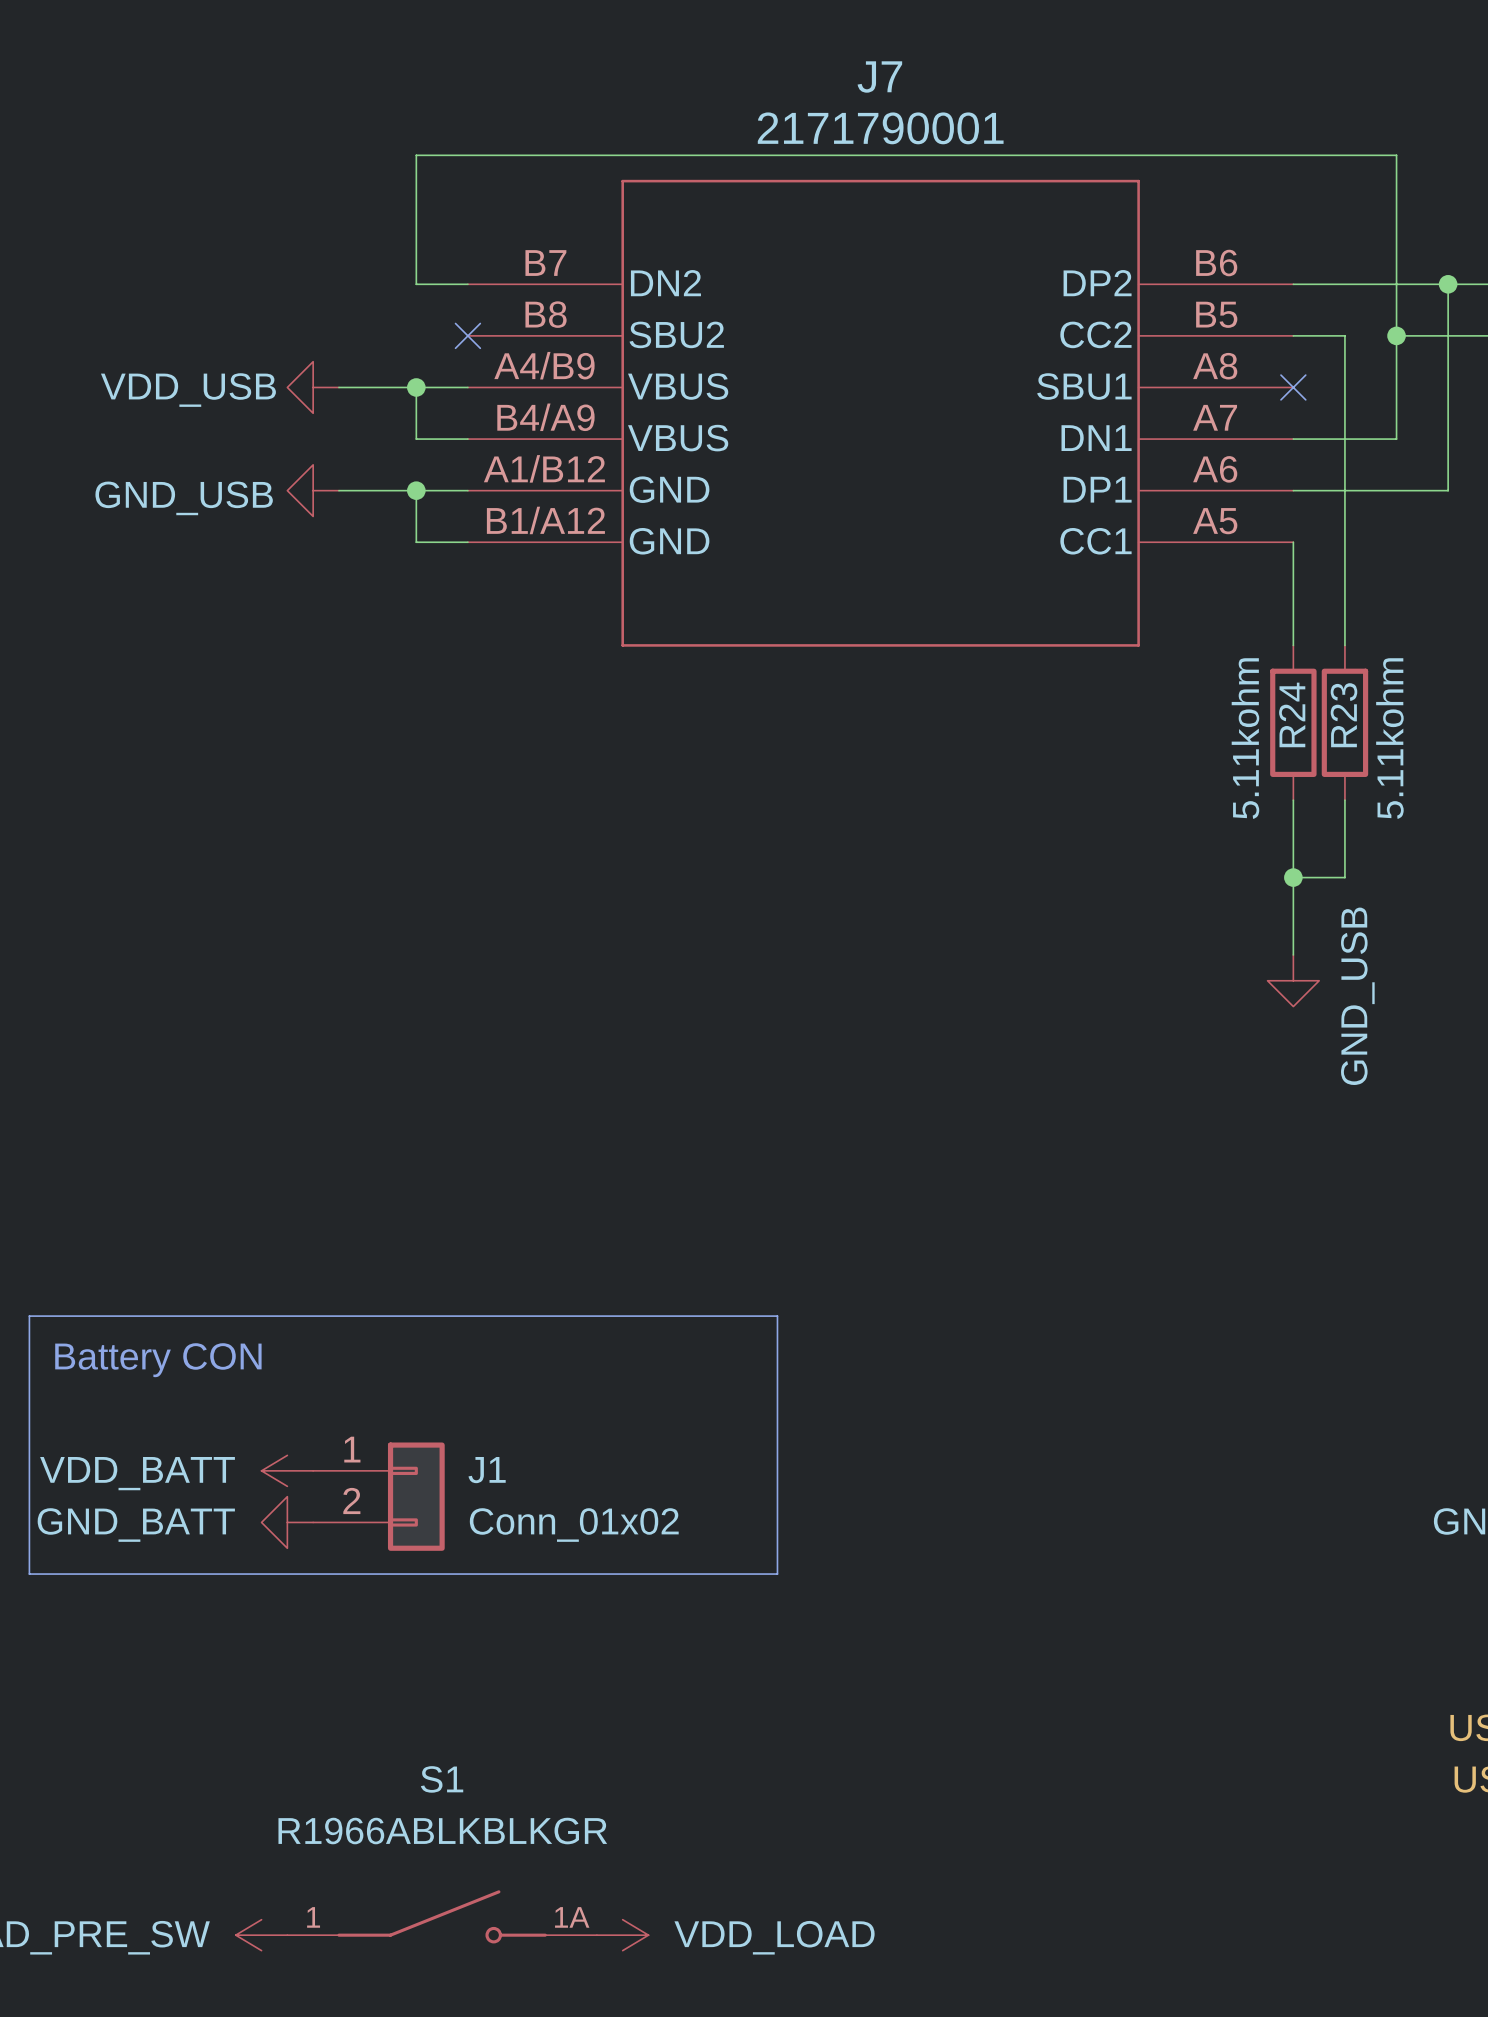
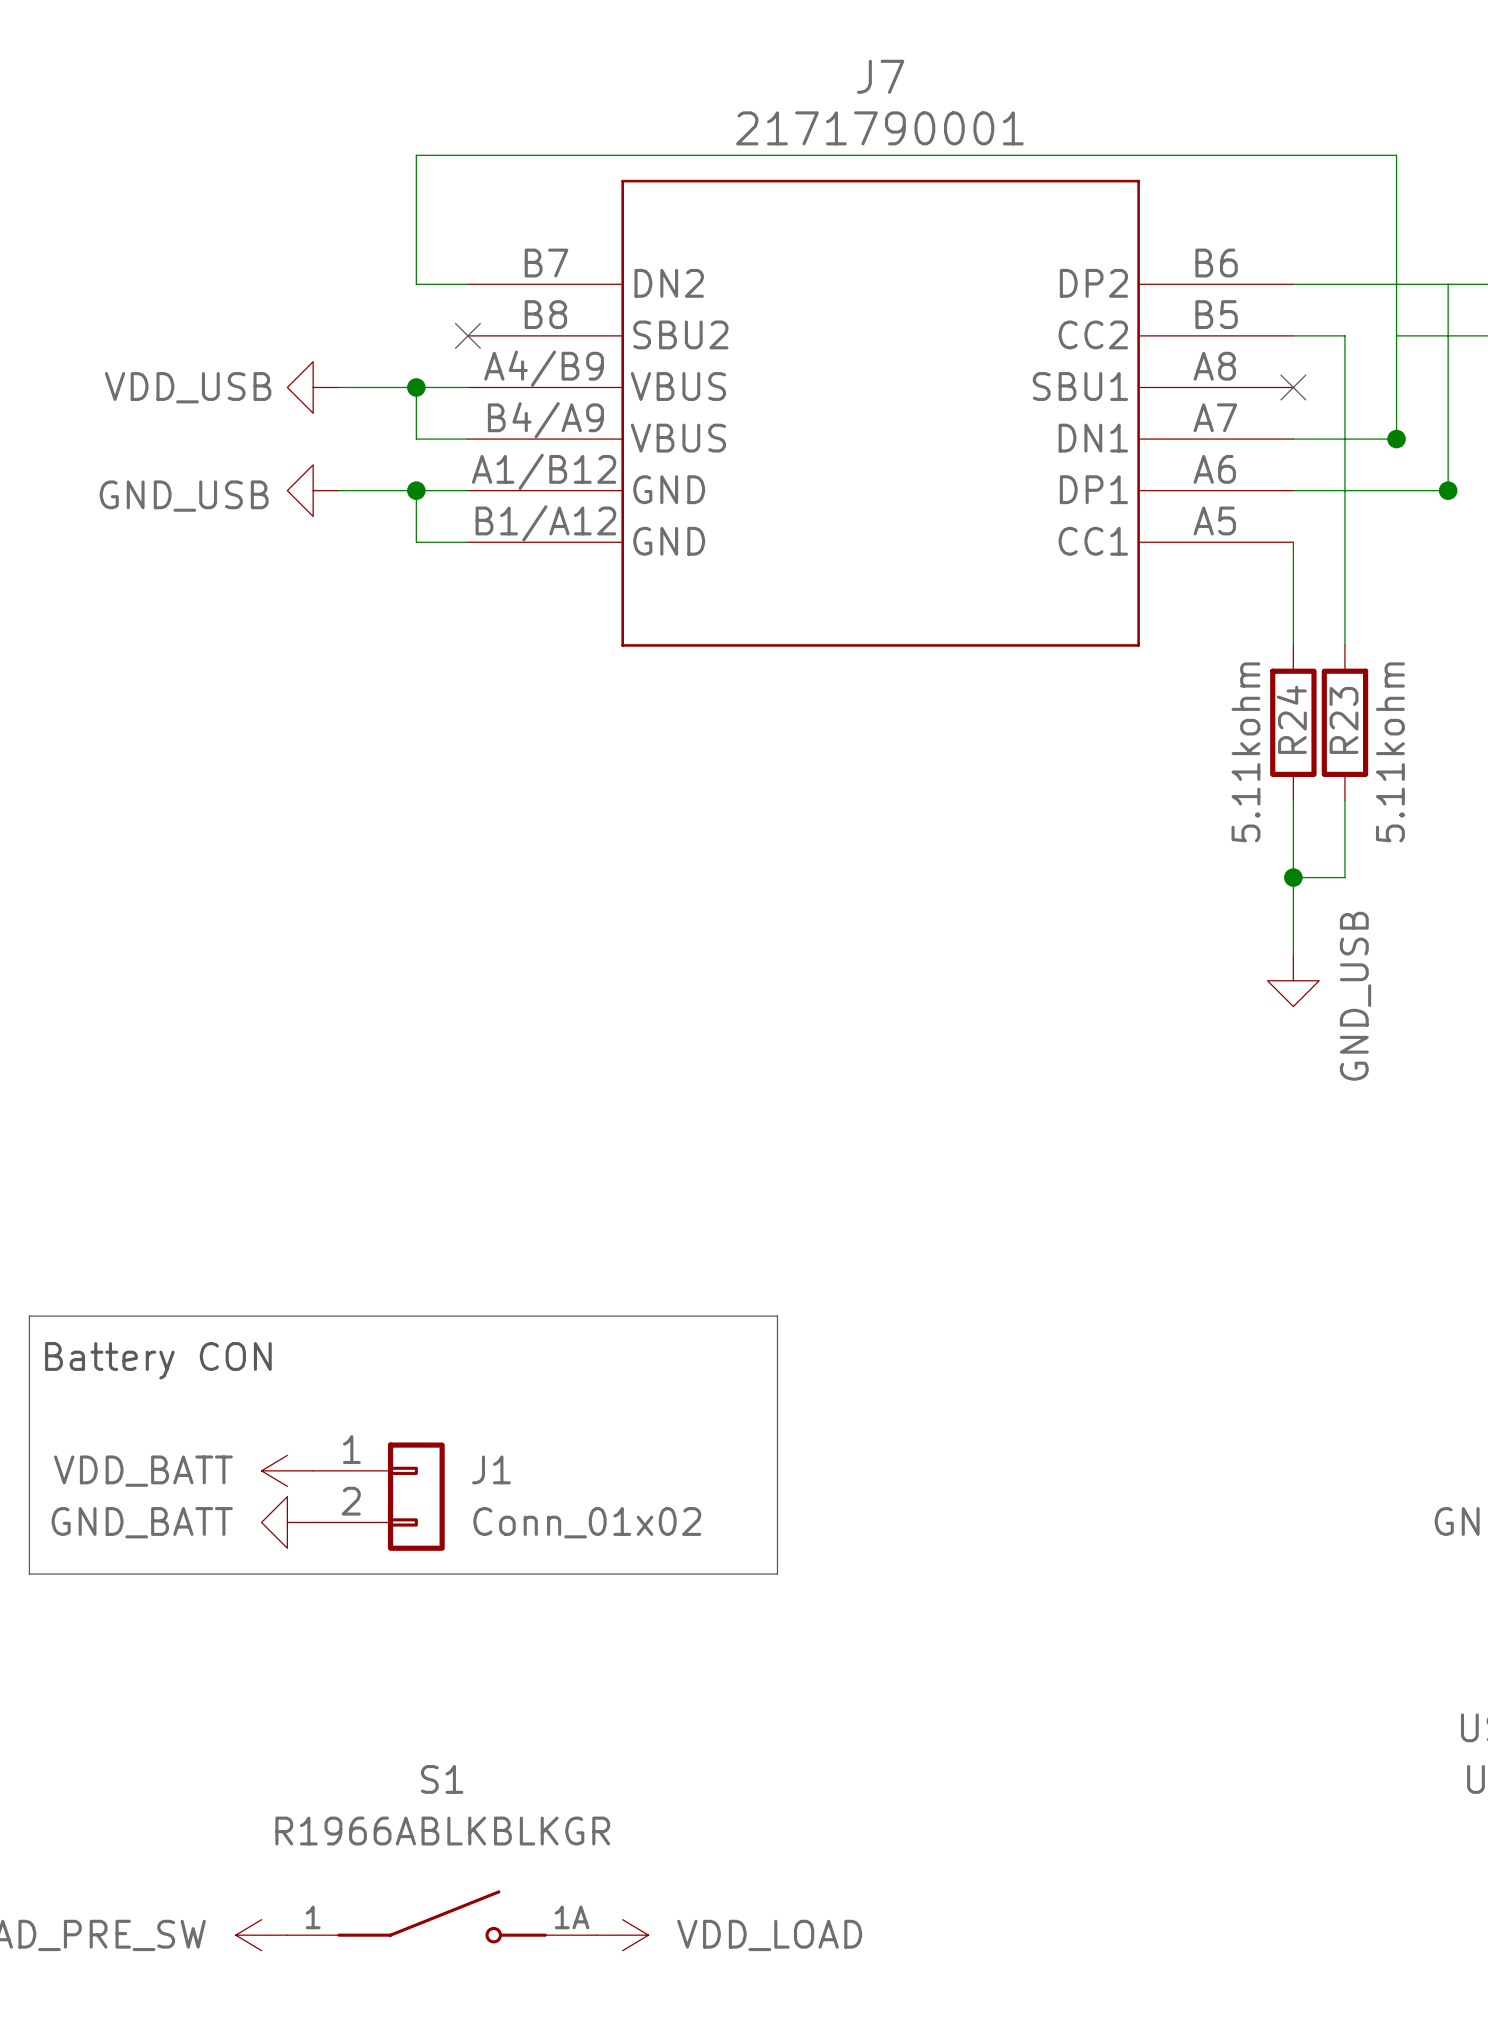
junction: (1448, 284) -> none
junction: (1396, 335) -> none
junction: none -> (1396, 439)
junction: none -> (1448, 490)

